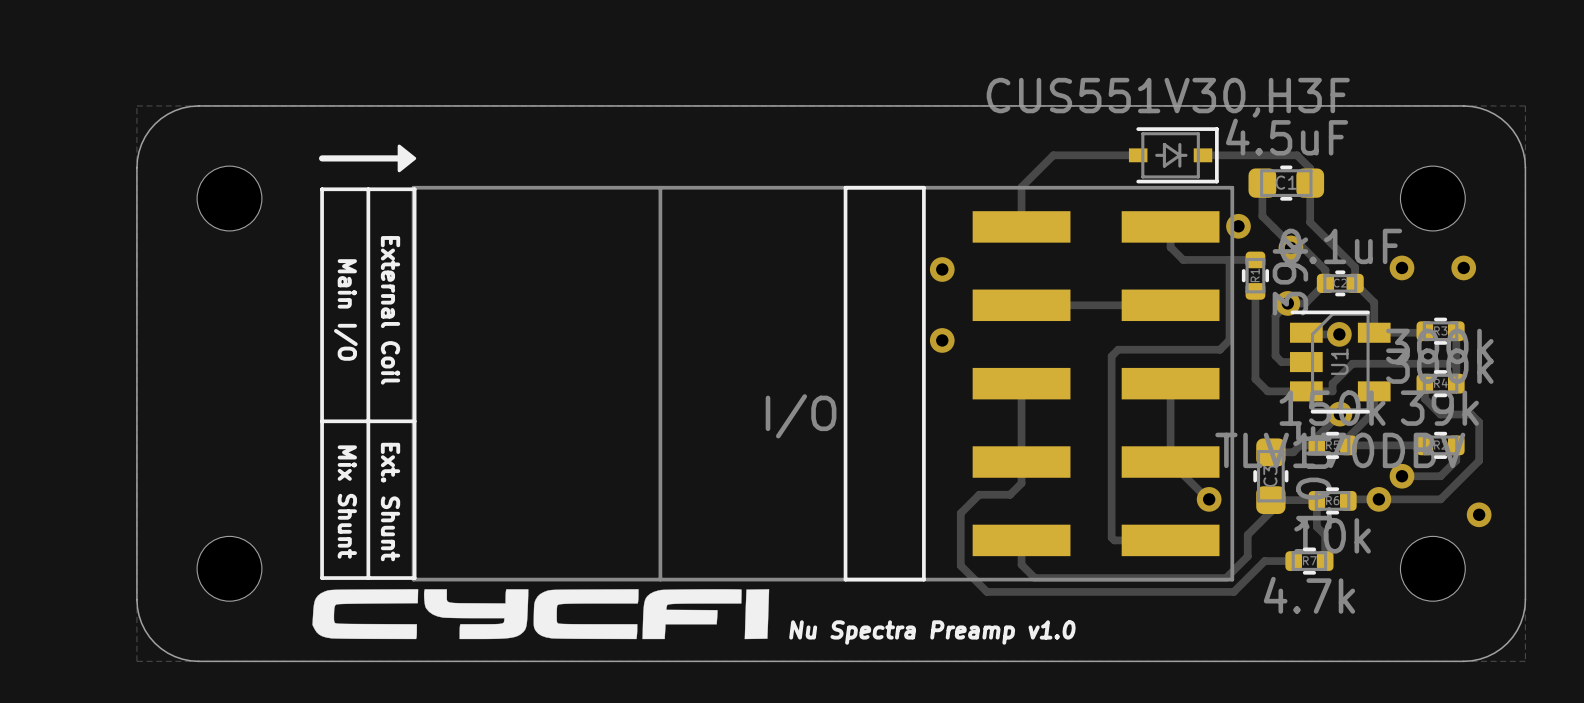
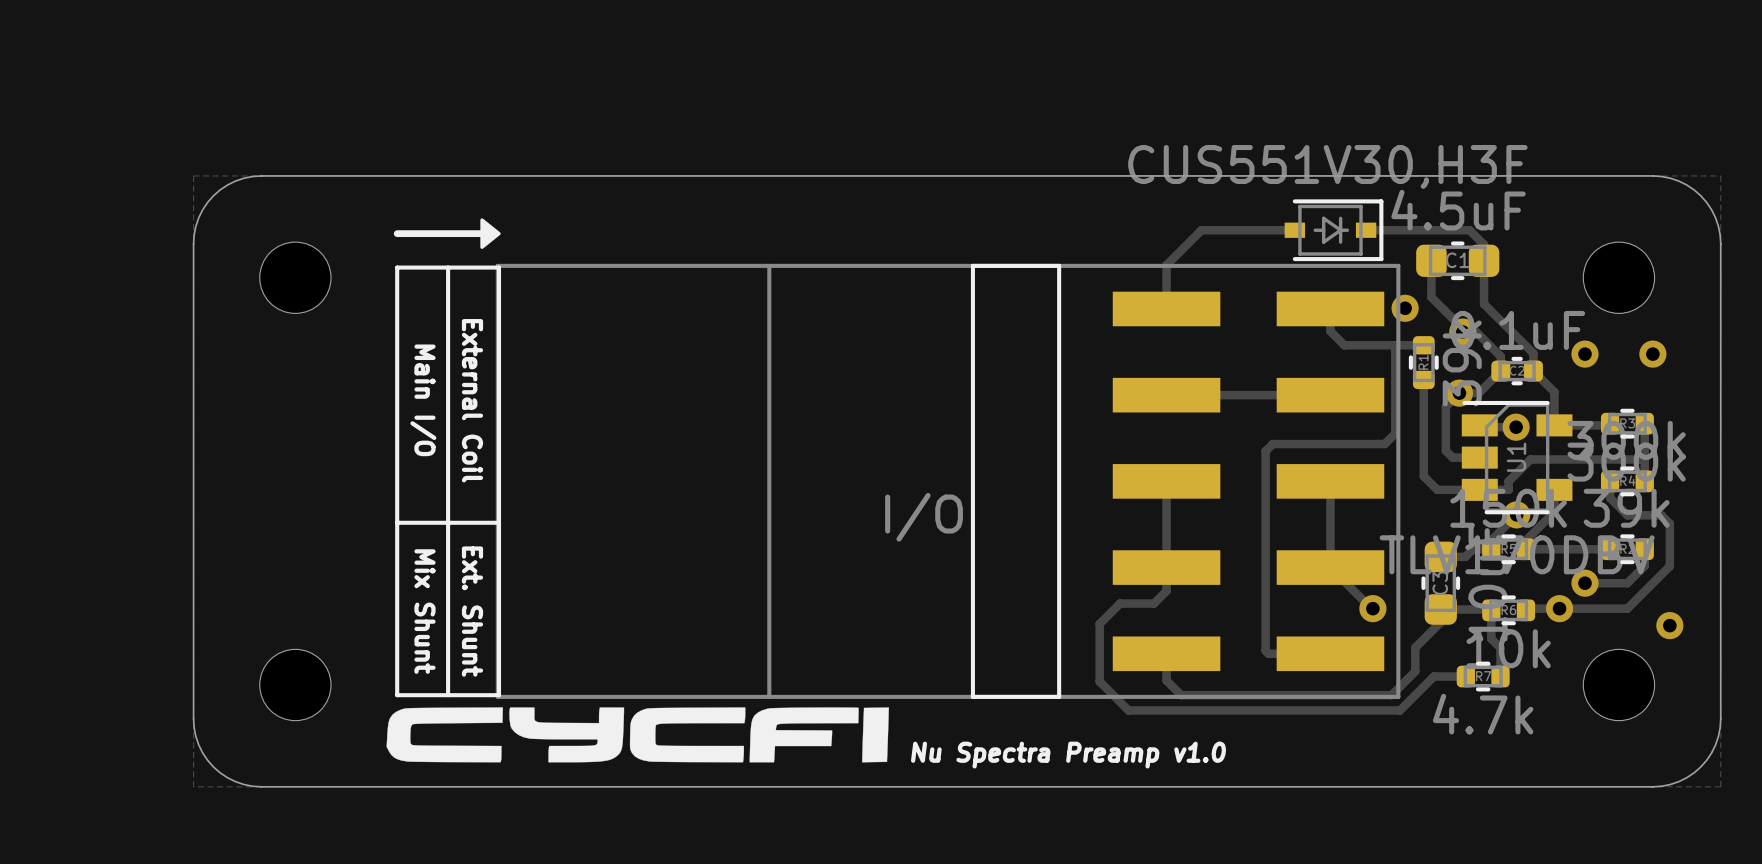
via: (942, 269) -> none
via: (942, 340) -> none

